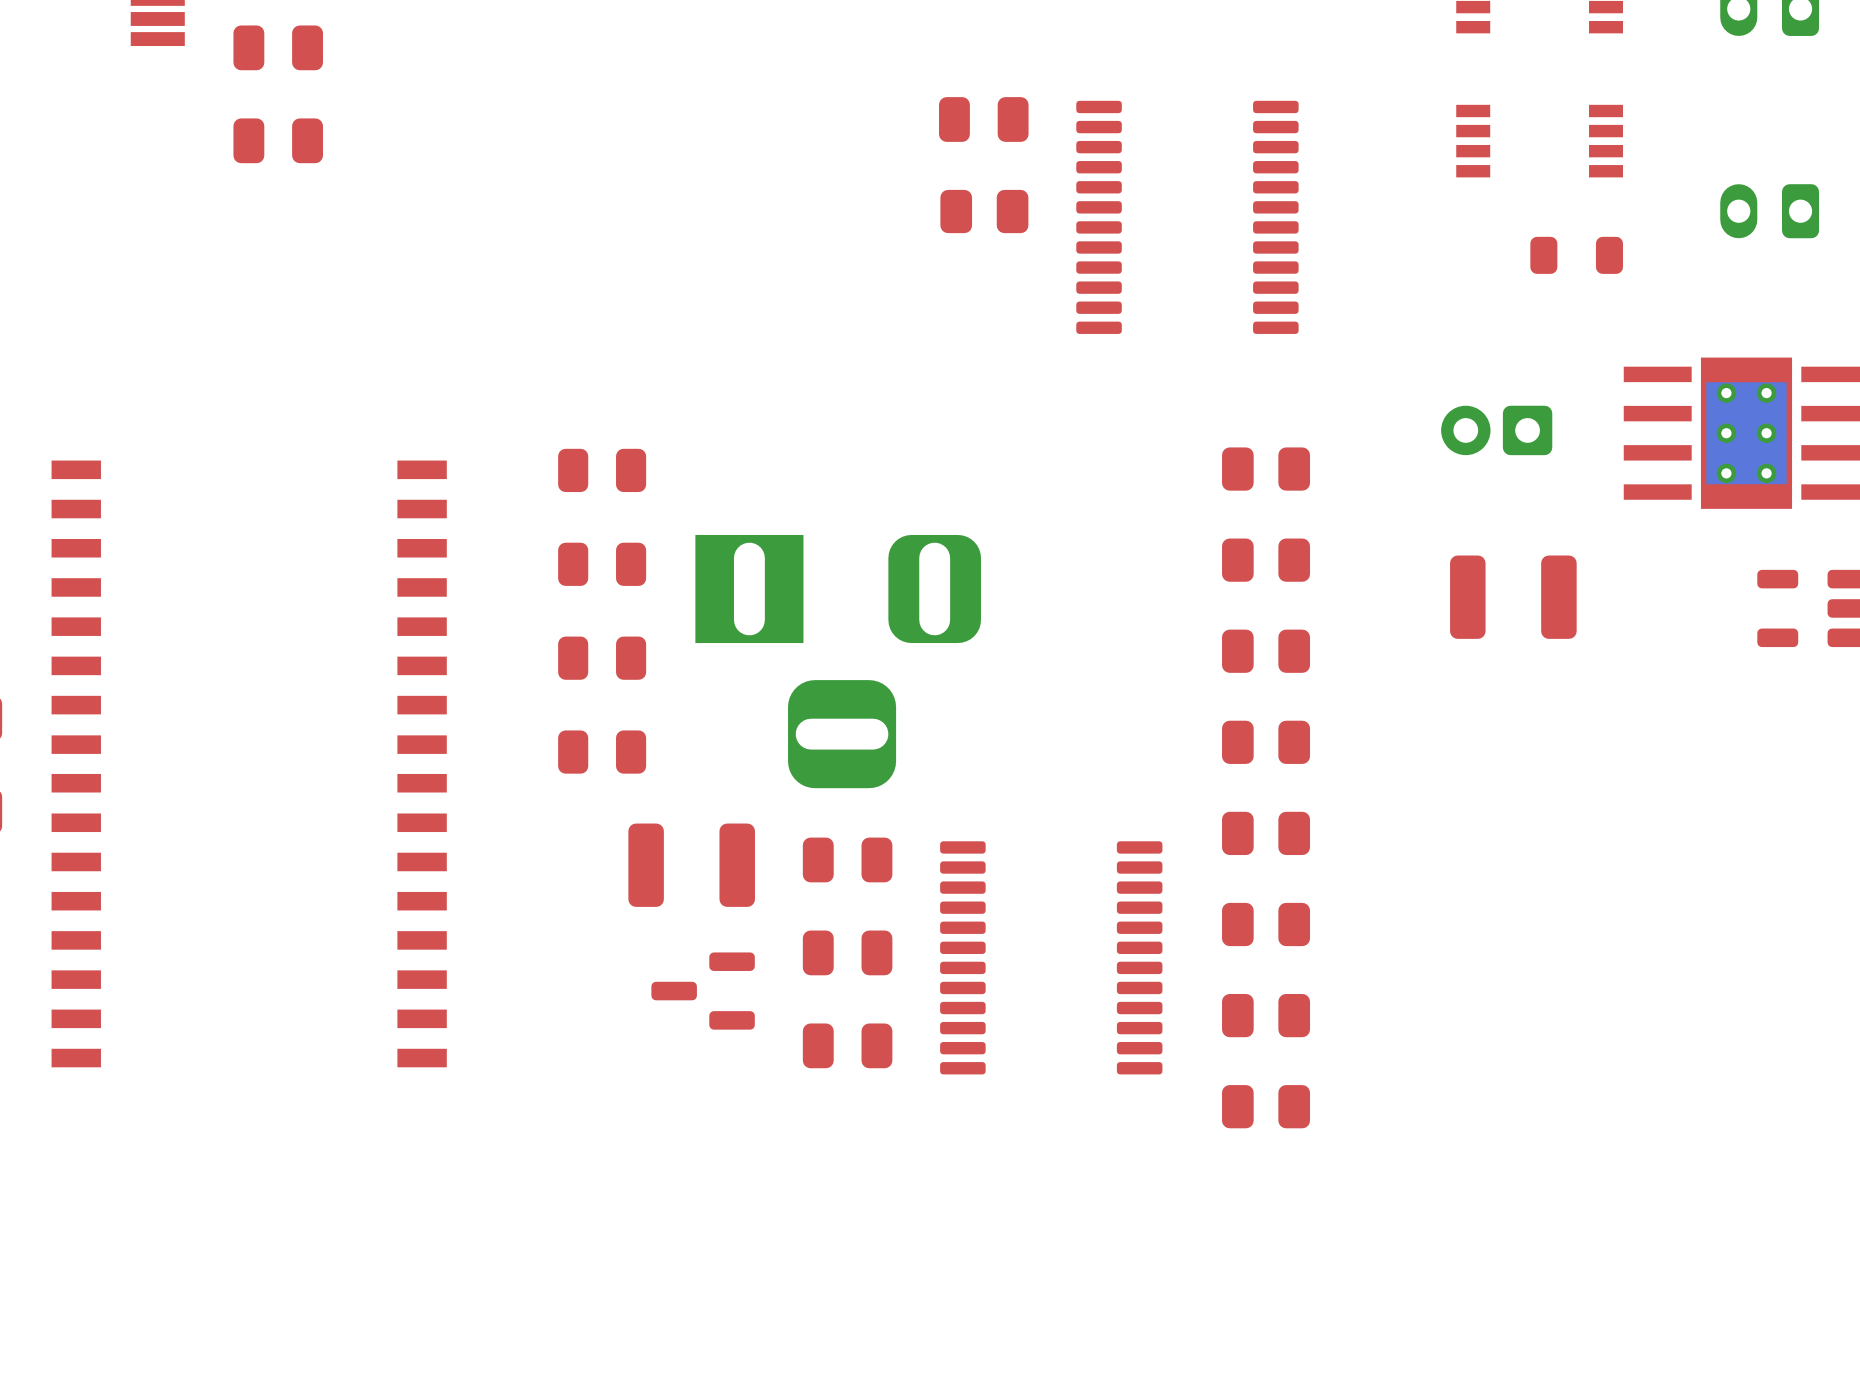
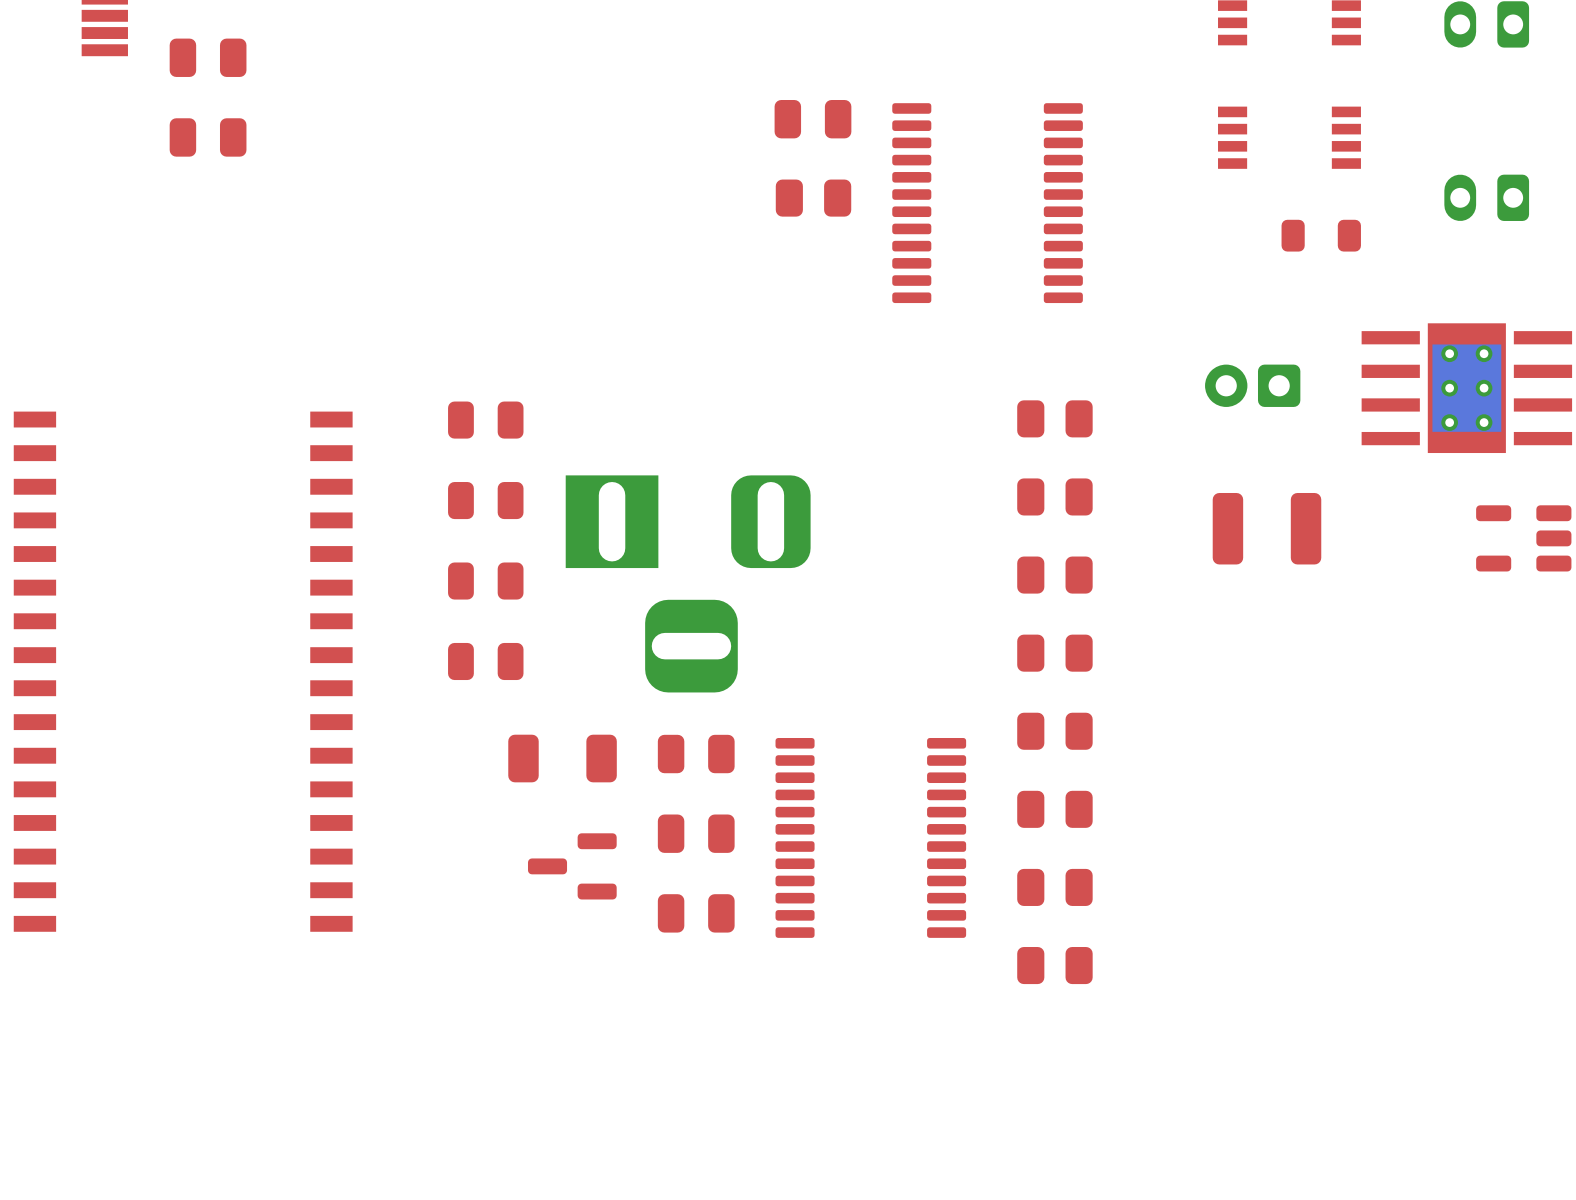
part footprint: [628, 823, 755, 907] -> [508, 734, 617, 783]

